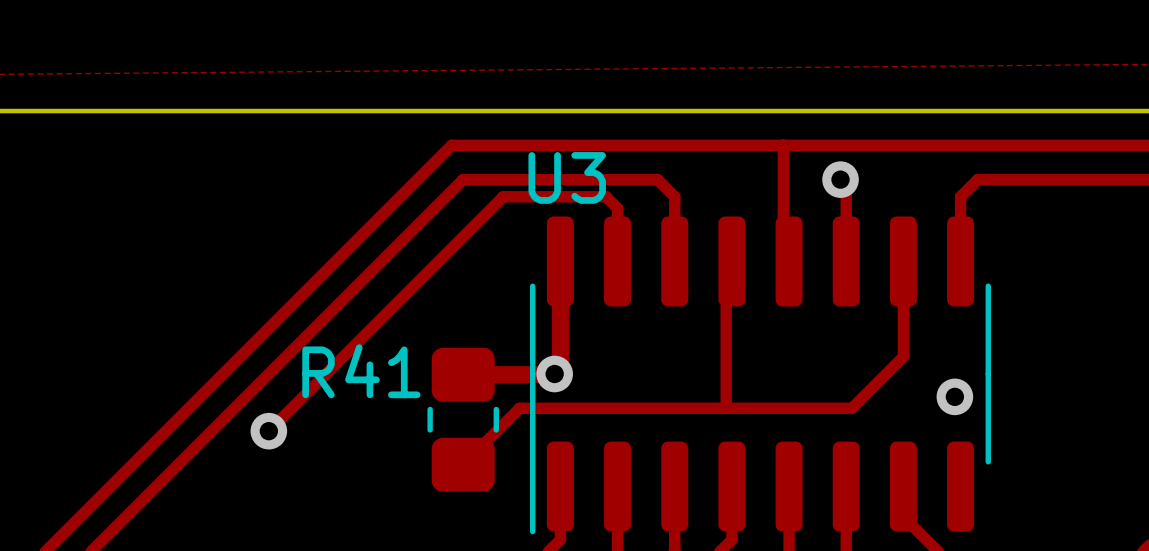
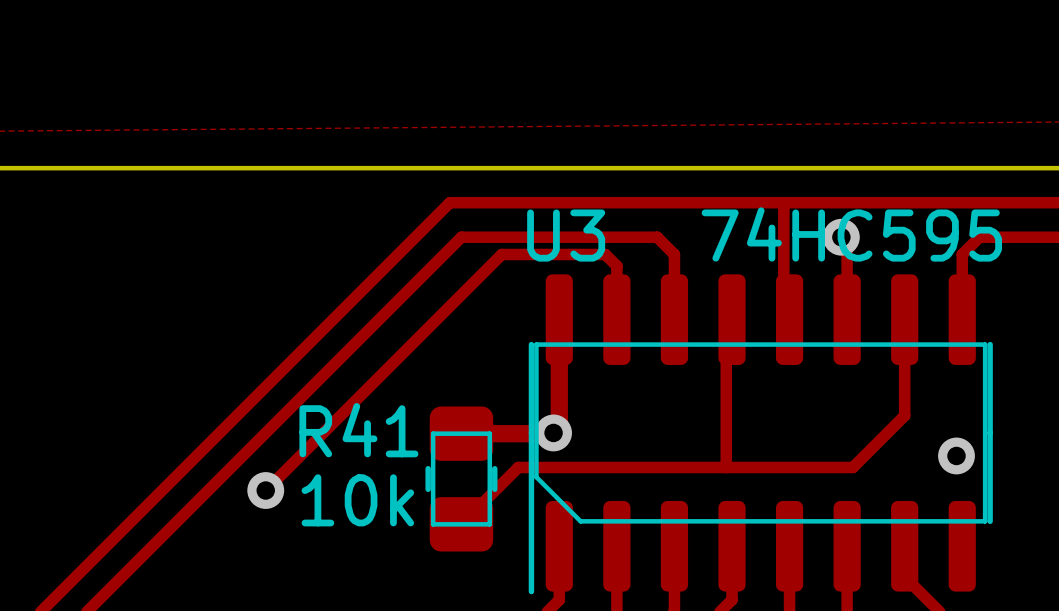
U3 value: none -> 74HC595 (851, 234)
U3 footprint: [530, 216, 991, 535] -> [528, 274, 993, 595]
R41 footprint: [427, 347, 500, 492] -> [425, 406, 498, 552]
R41 value: none -> 10k (357, 500)

